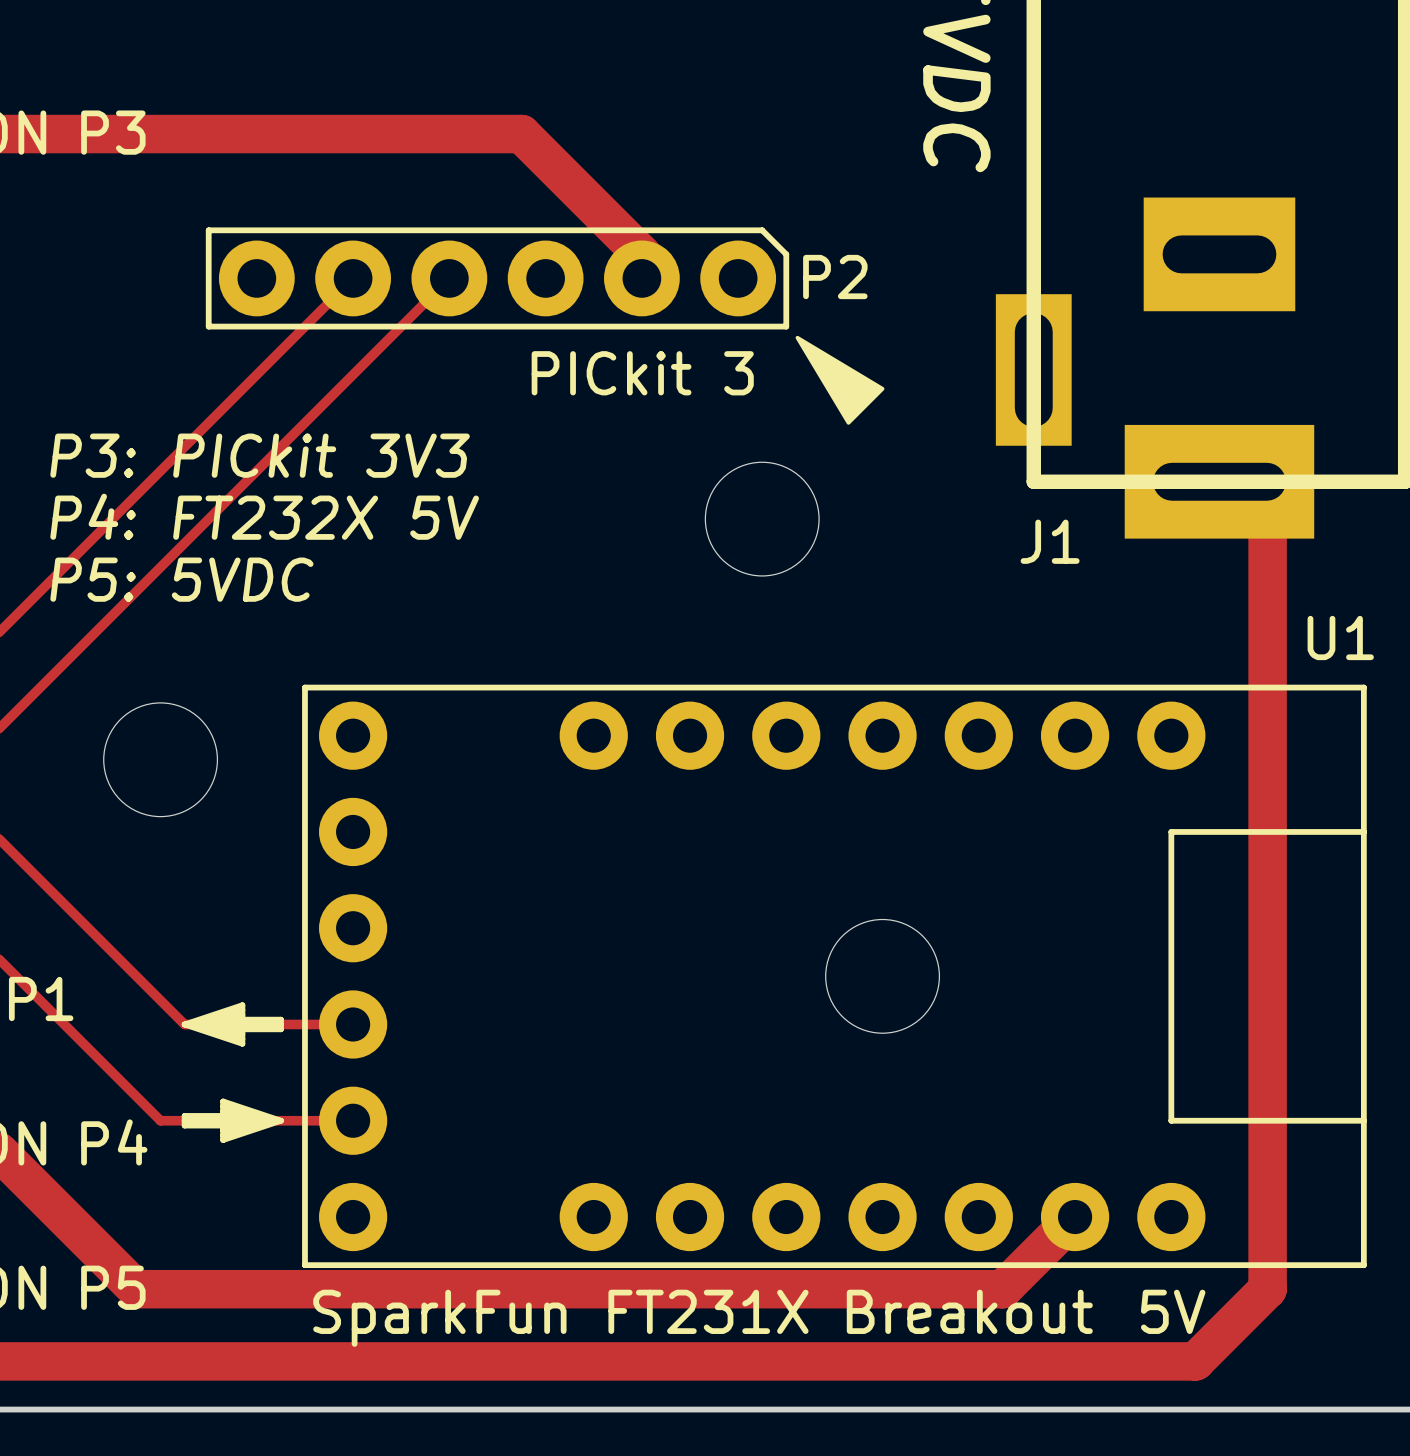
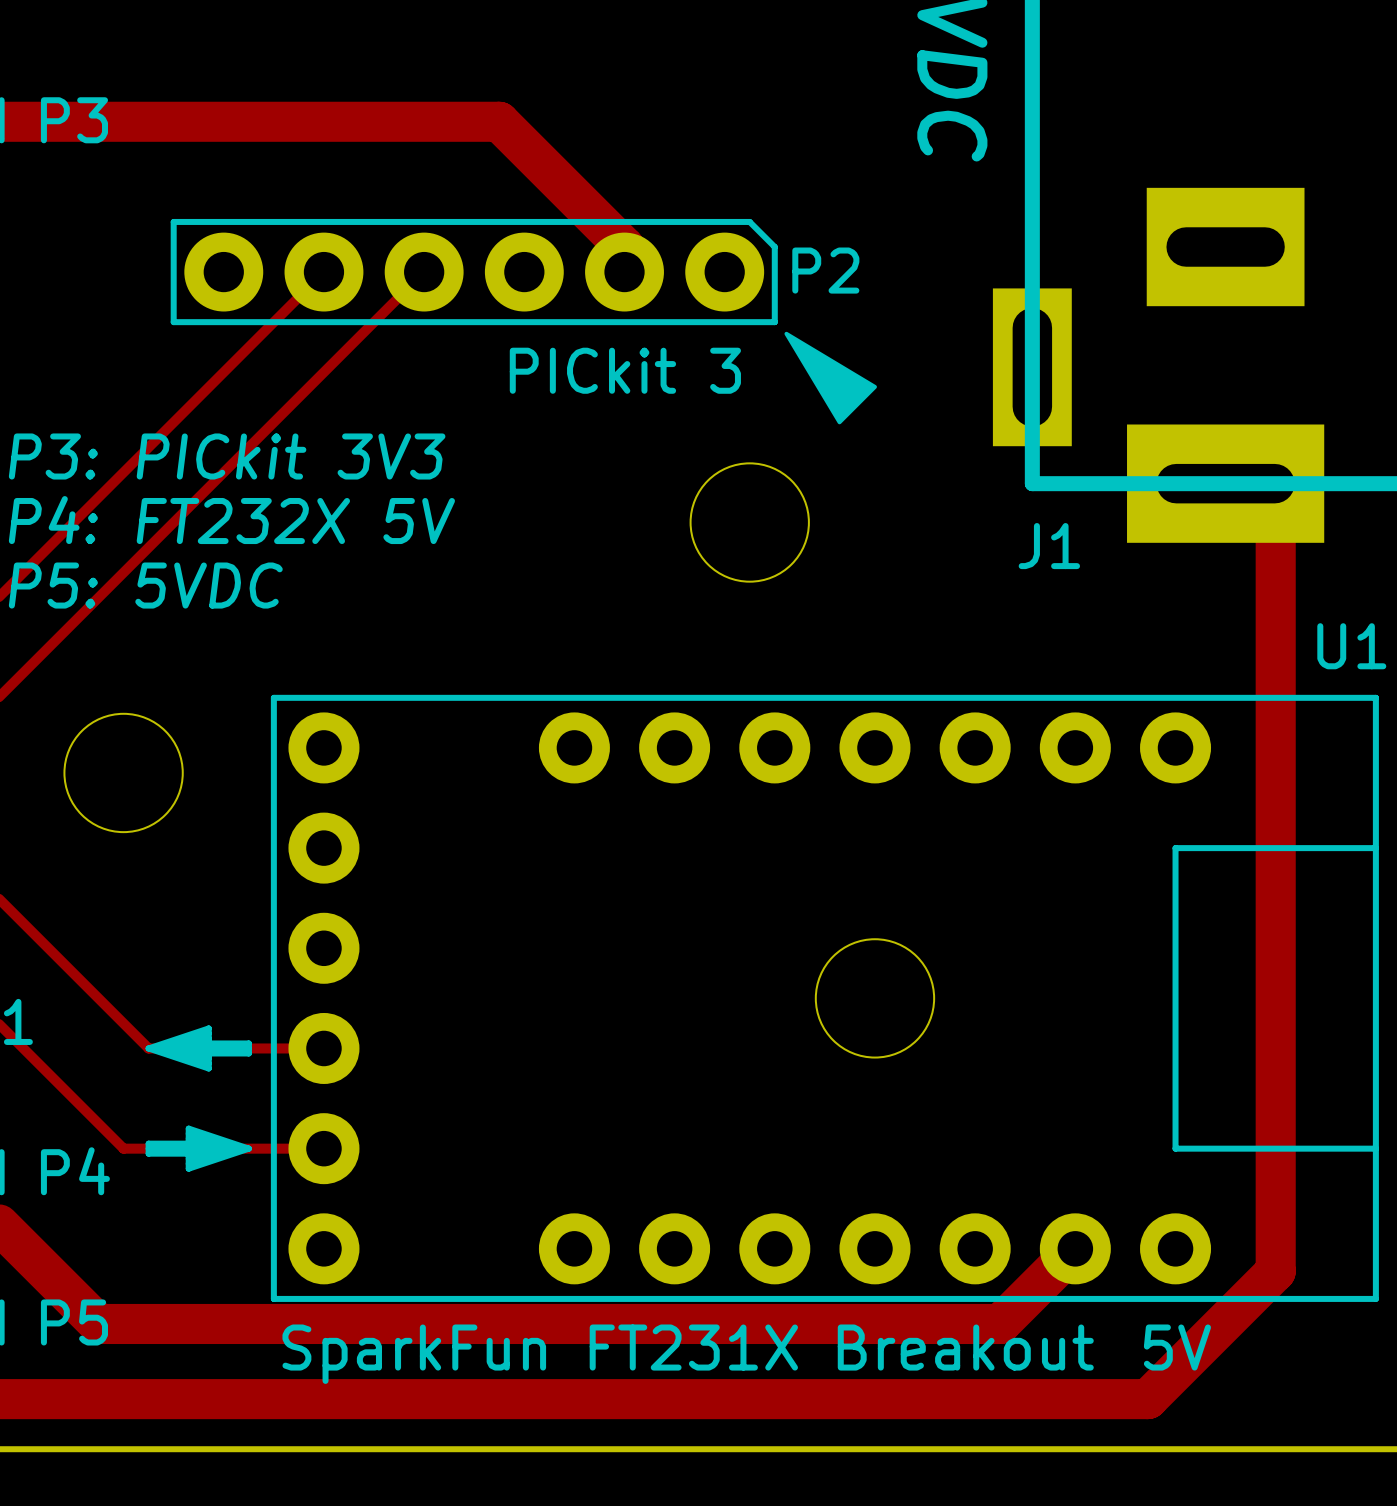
track: (1267, 1238) (1267, 1289) (1195, 1361) (1144, 1361) -> (1275, 1271) (1147, 1399)

